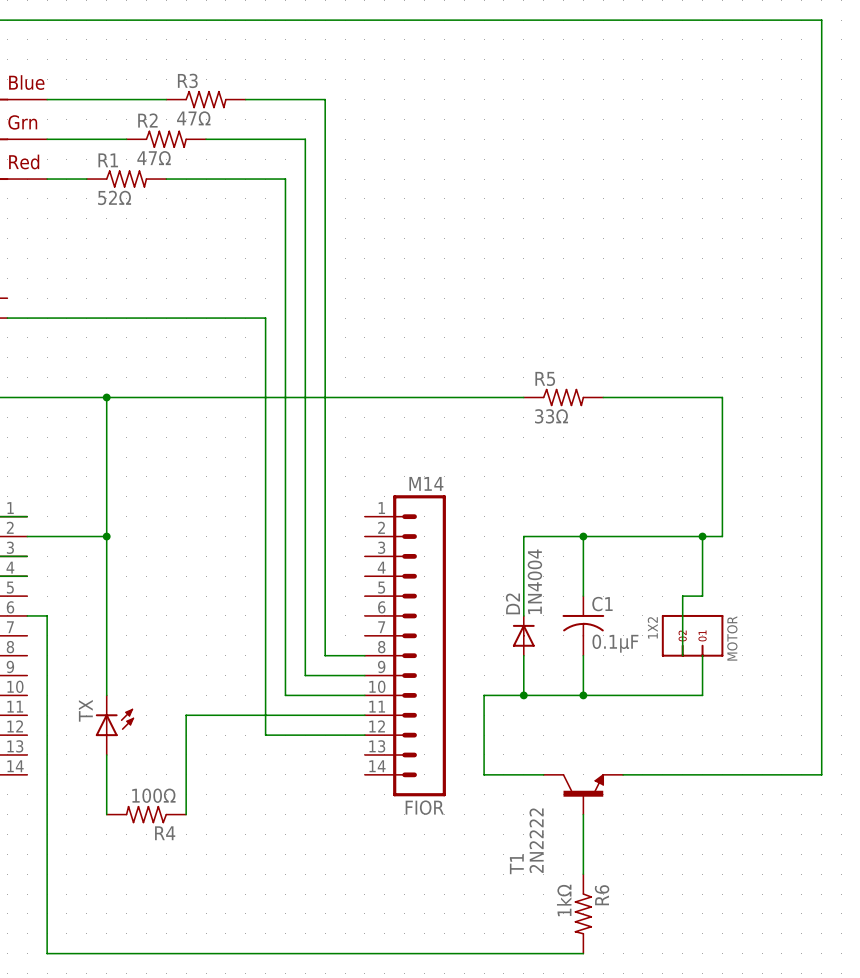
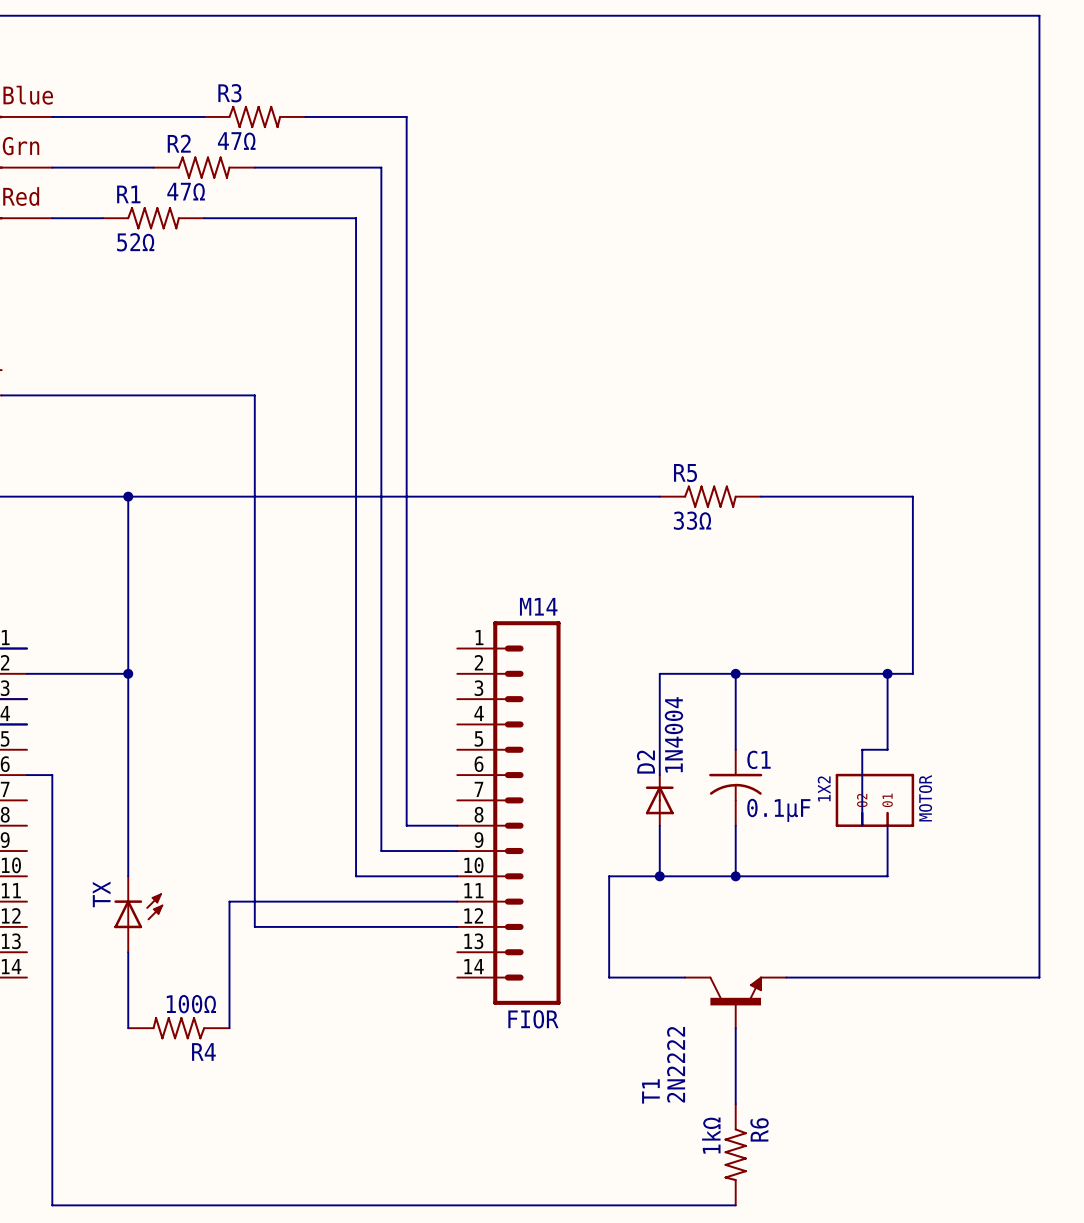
wire: (206, 318) (265, 318) (265, 735) -> (254, 395) (254, 926) (330, 926)

